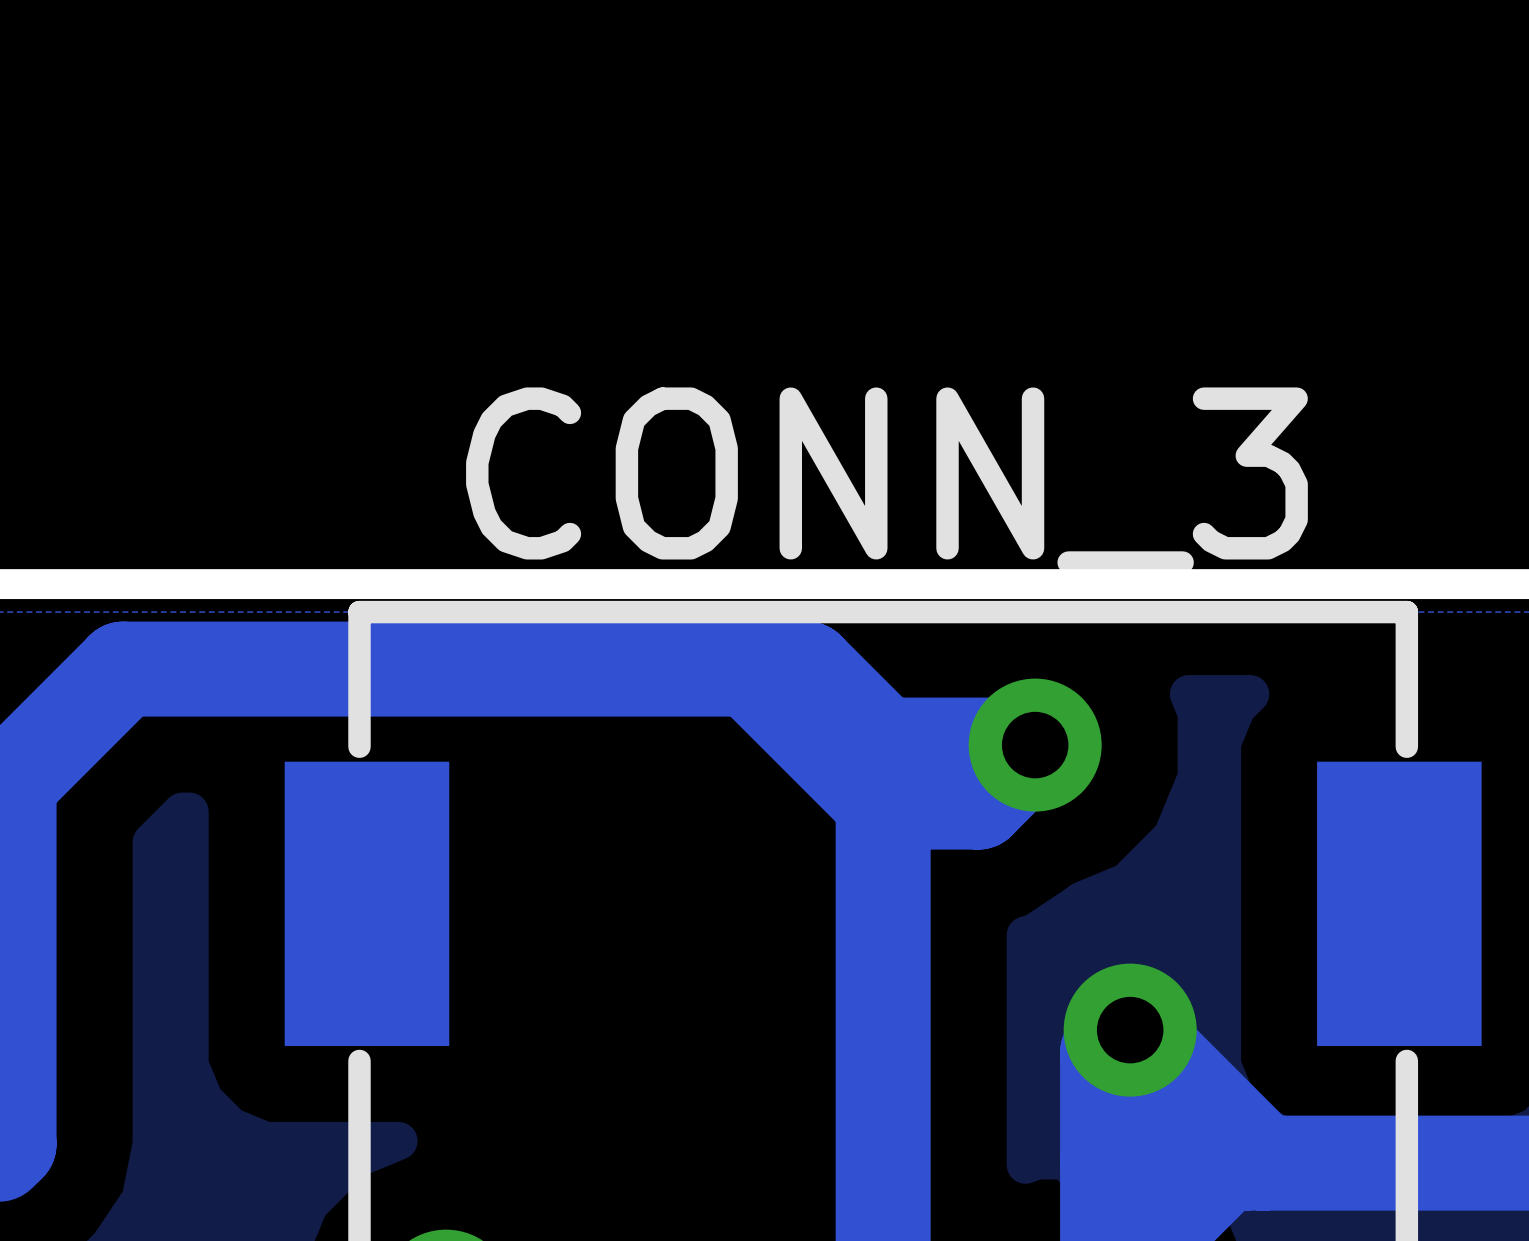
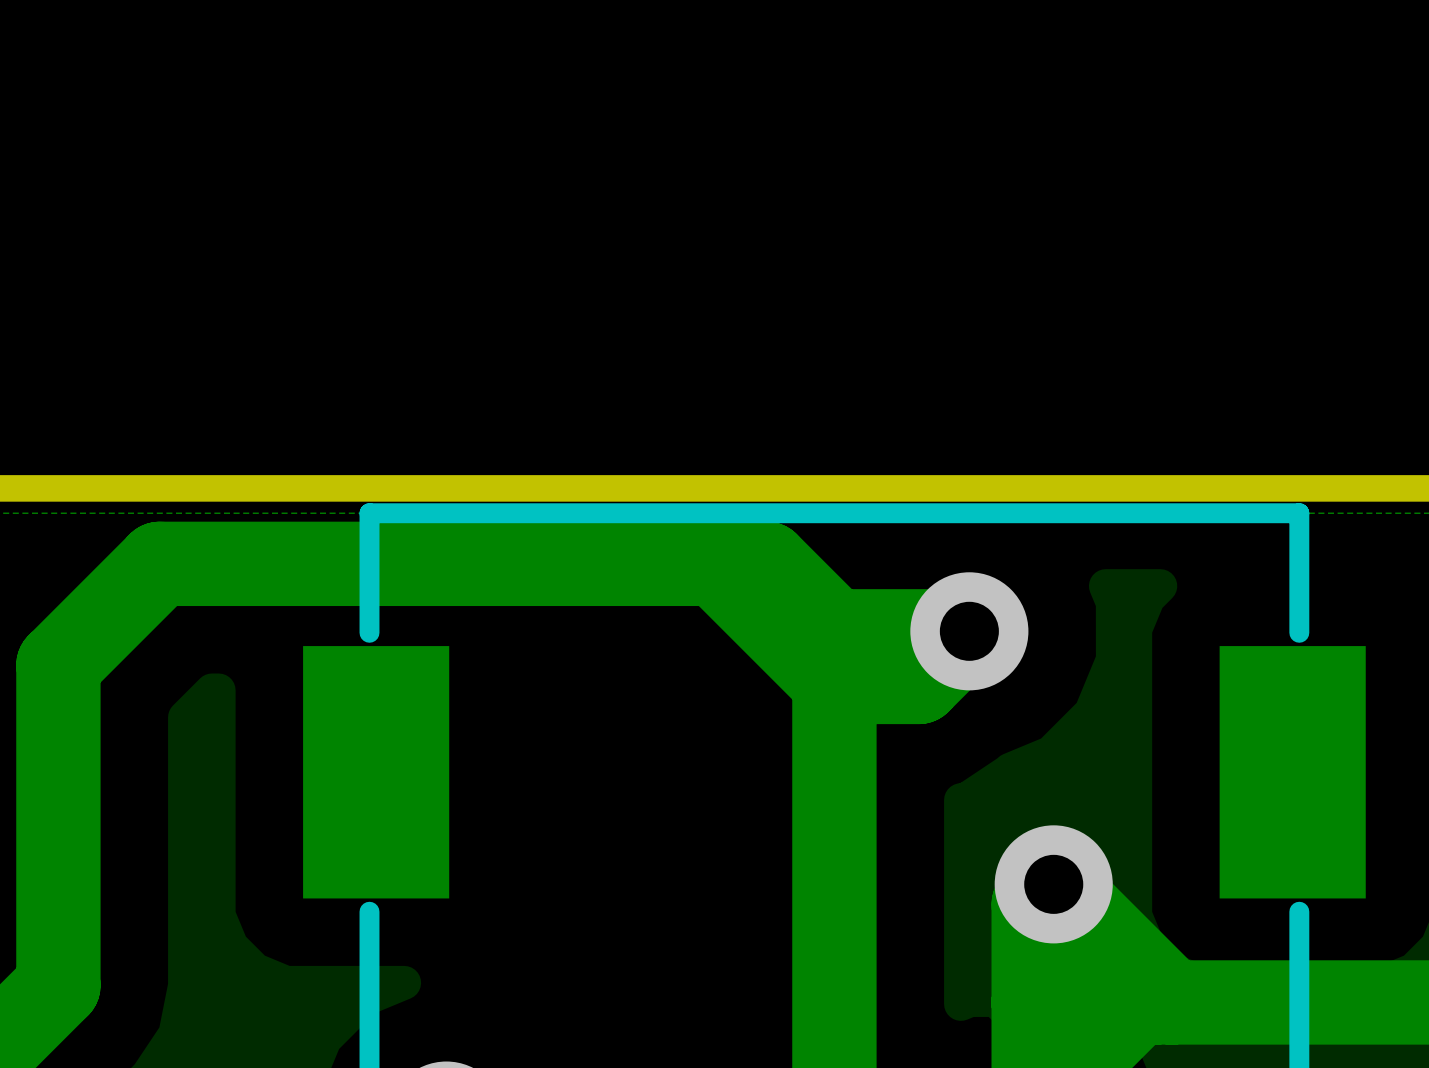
part value: CONN_3 (886, 480) -> none

